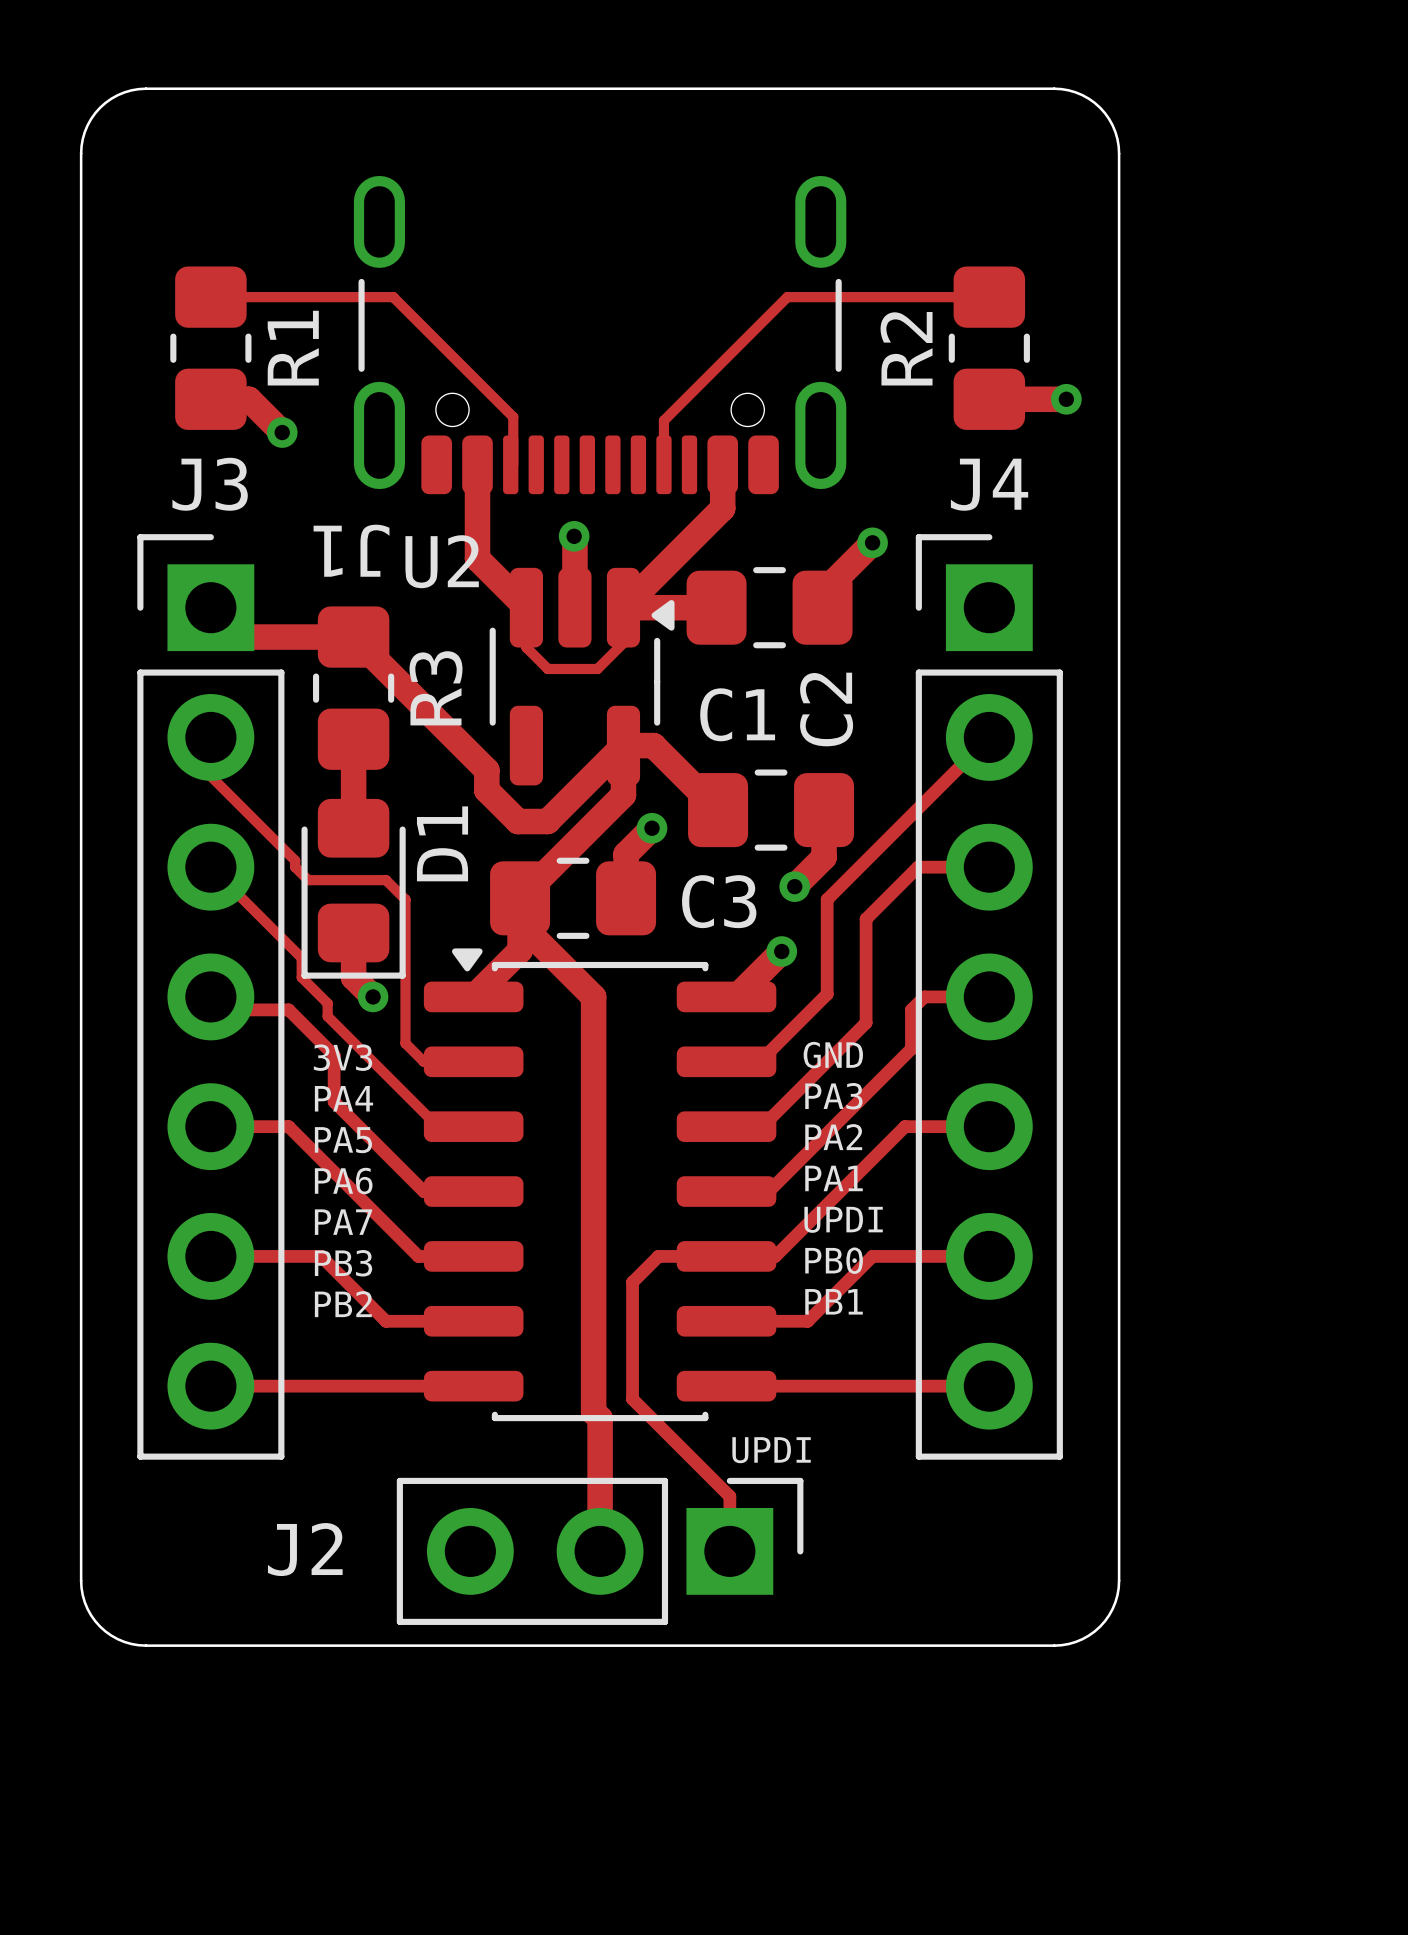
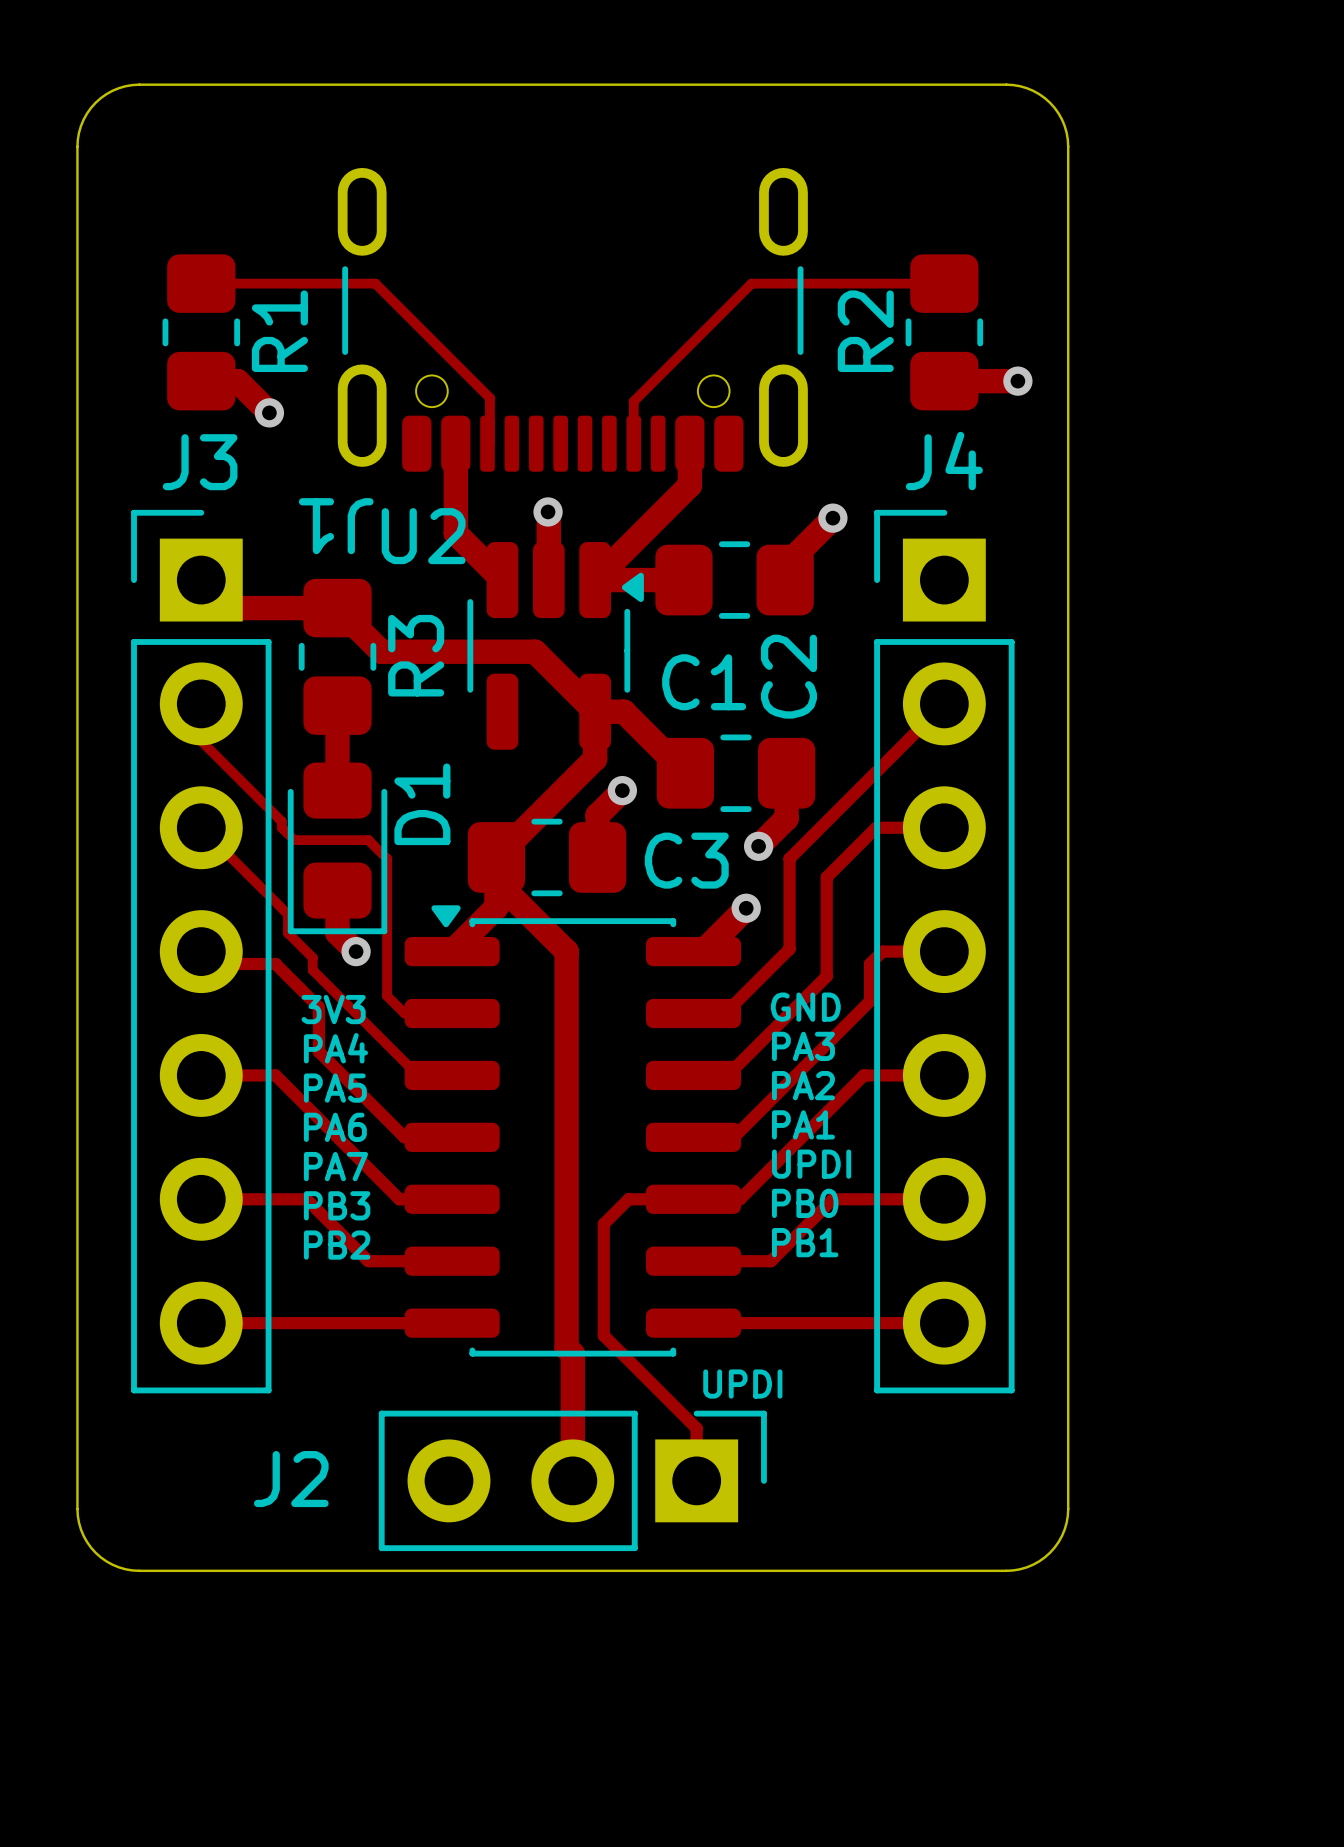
top track: (526, 607) (526, 647) (547, 668) (597, 668) (623, 643) (623, 607) -> none
top track: (399, 682) (486, 770) (486, 790) (518, 821) (547, 821) (623, 745) -> (381, 651) (535, 651) (595, 711)

